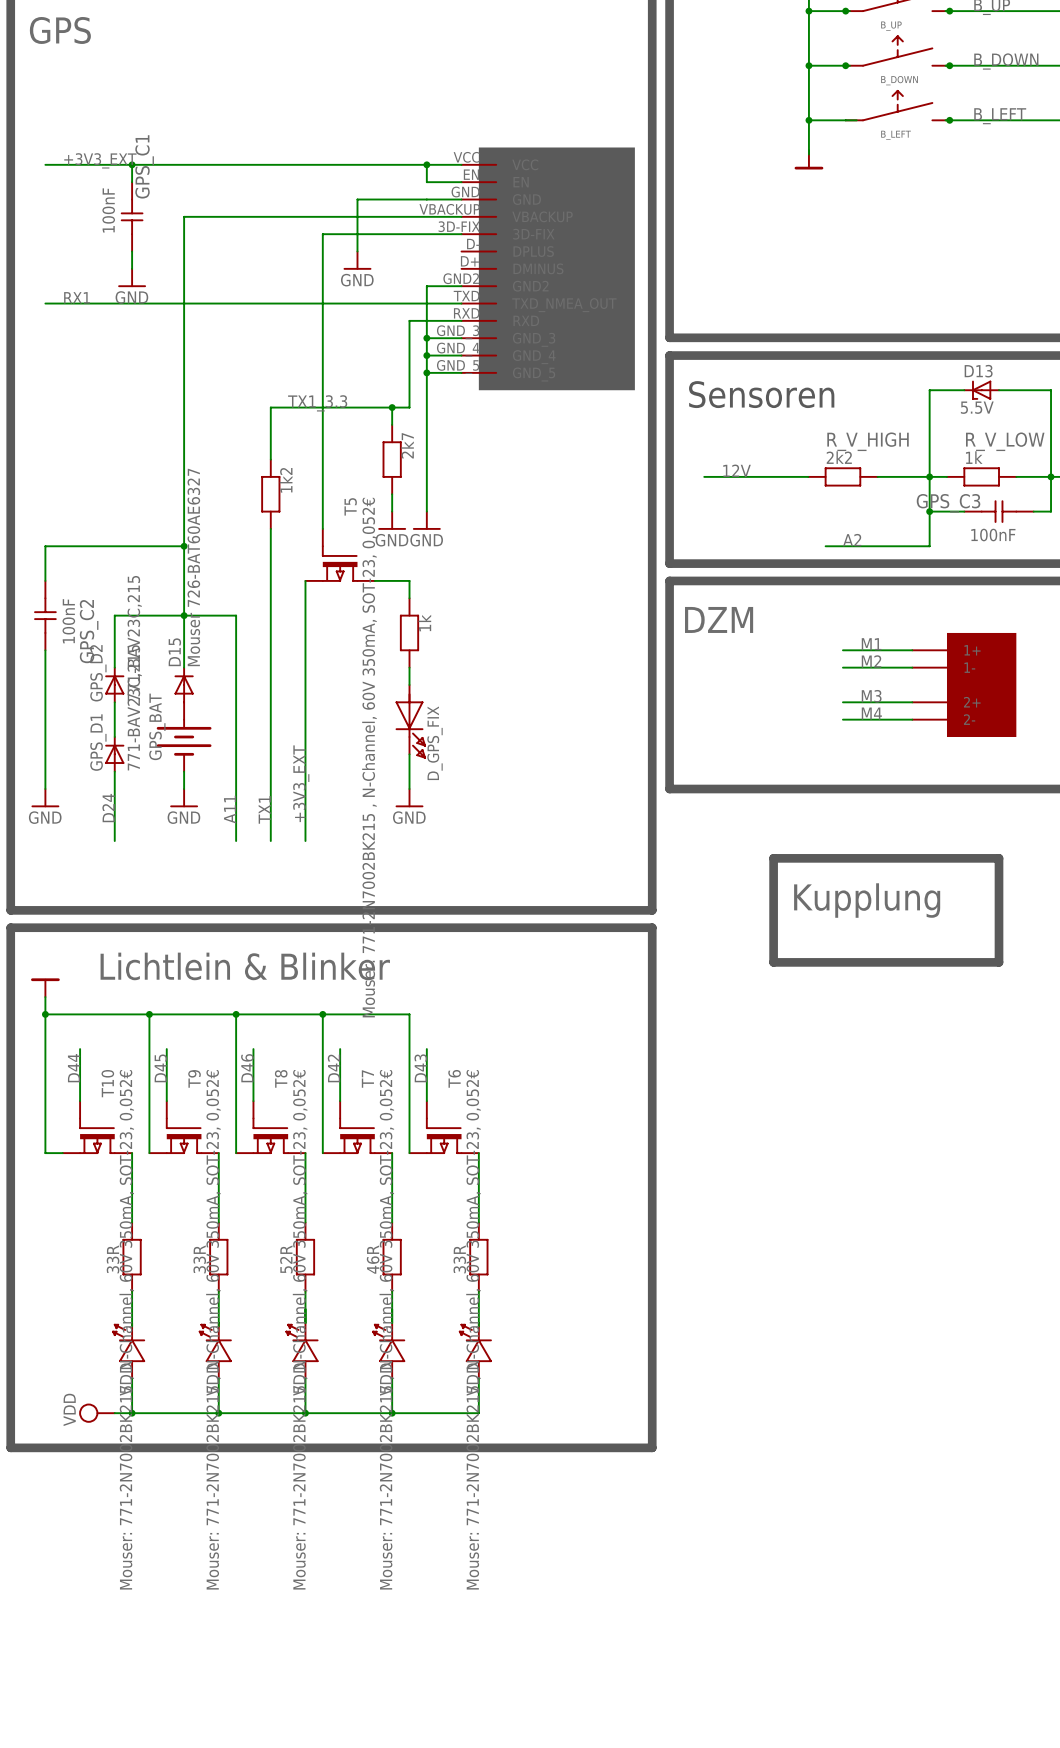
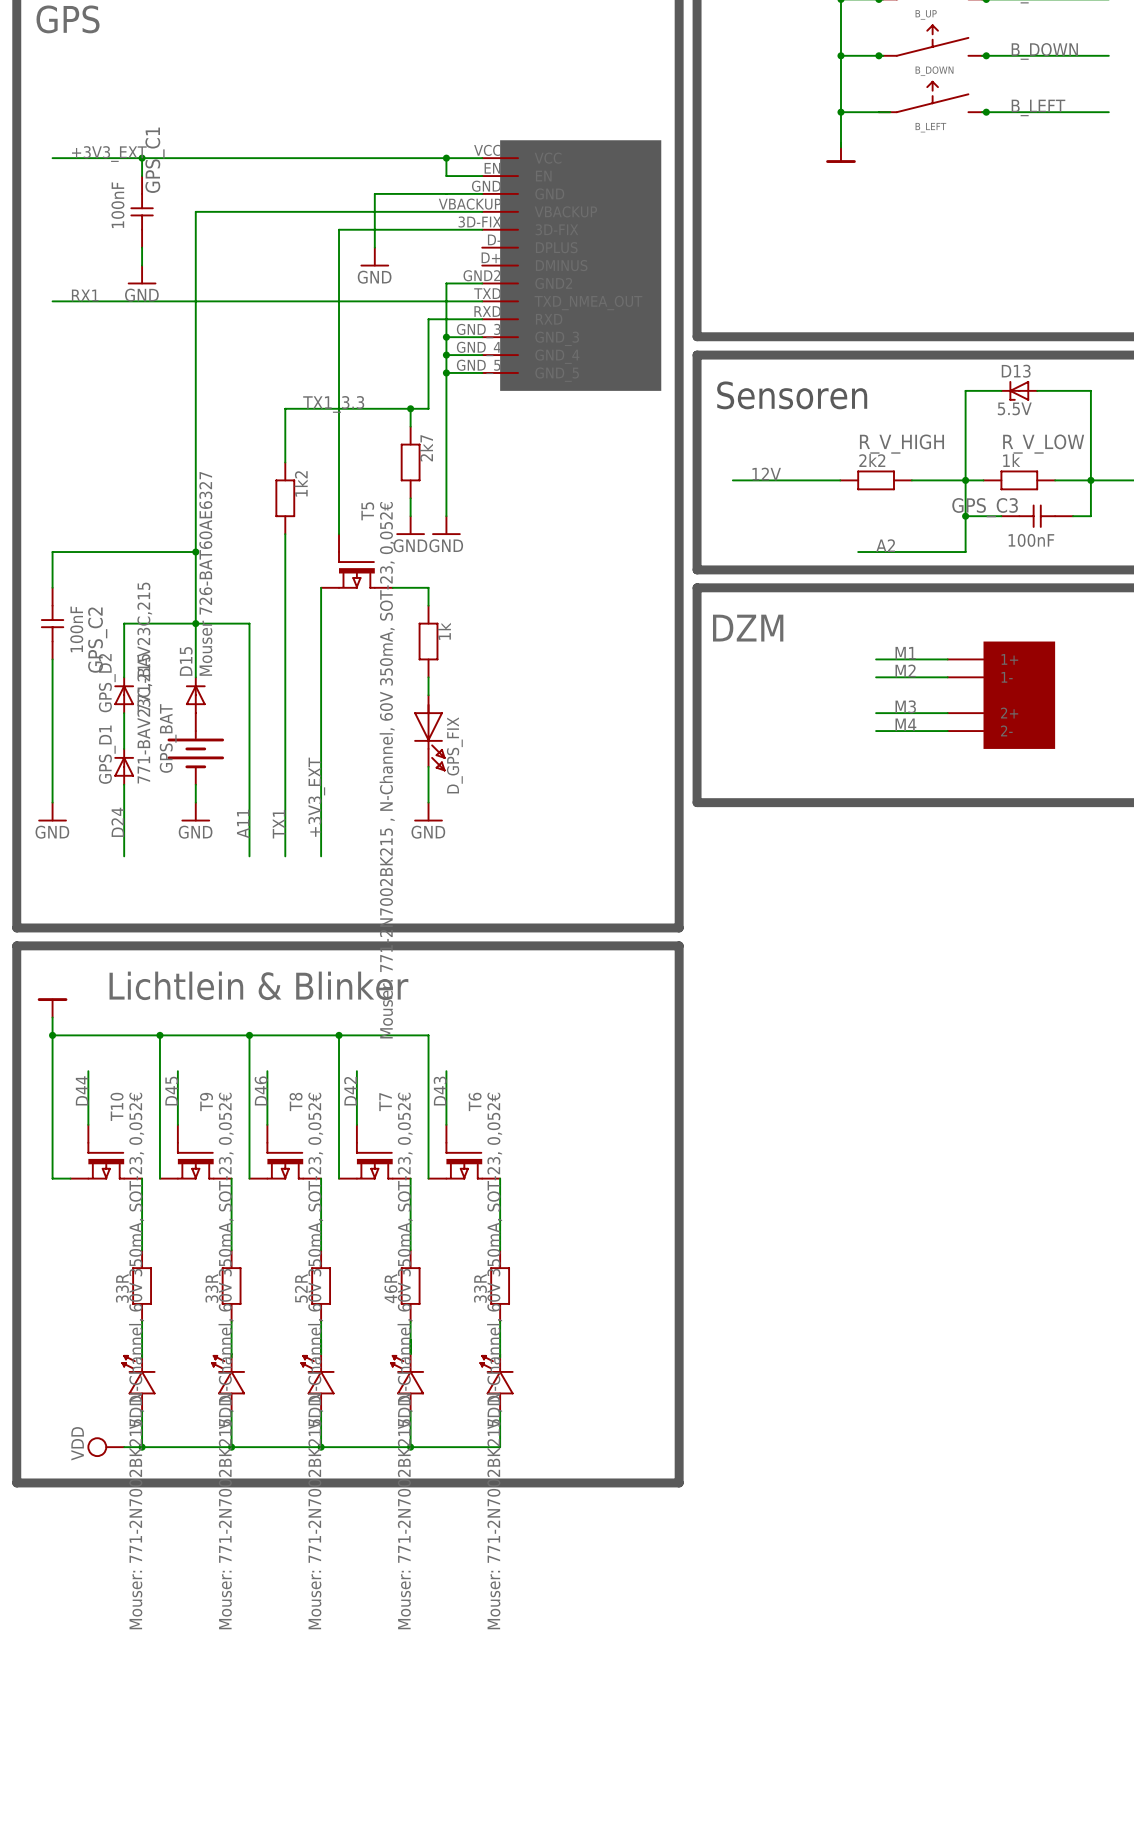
line: (773, 858) (999, 858) (999, 962) (773, 962) (773, 858) -> none
text: Kupplung (867, 900) -> none

